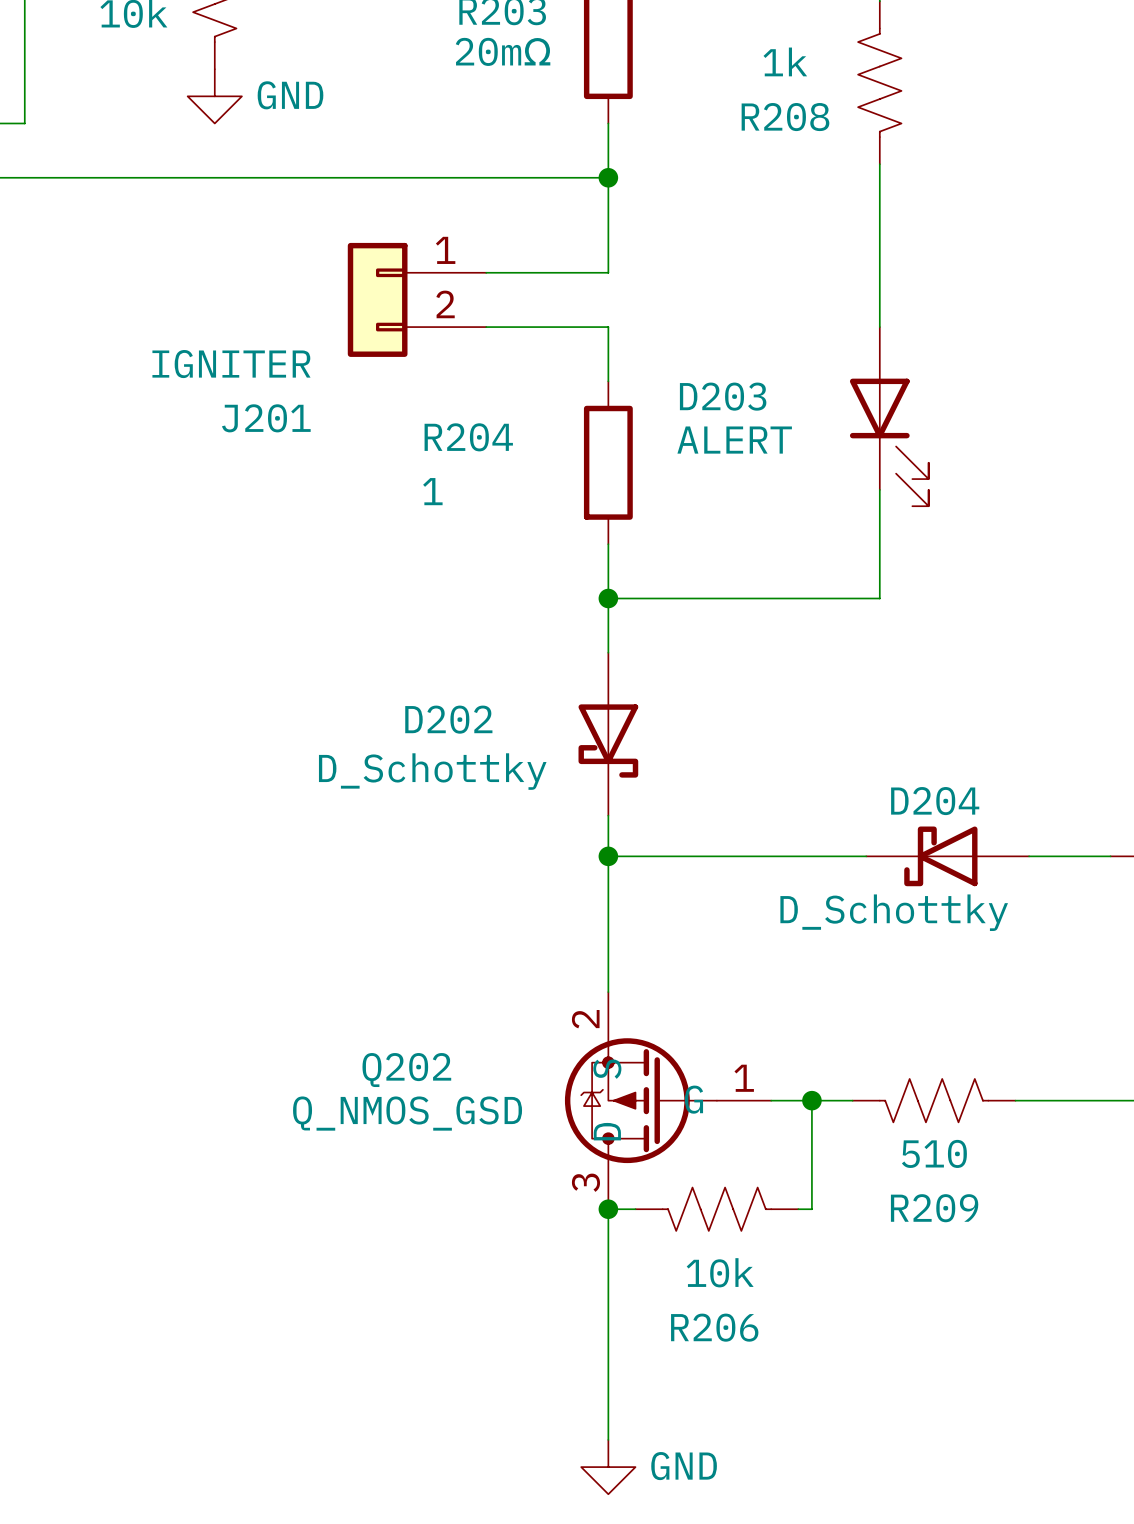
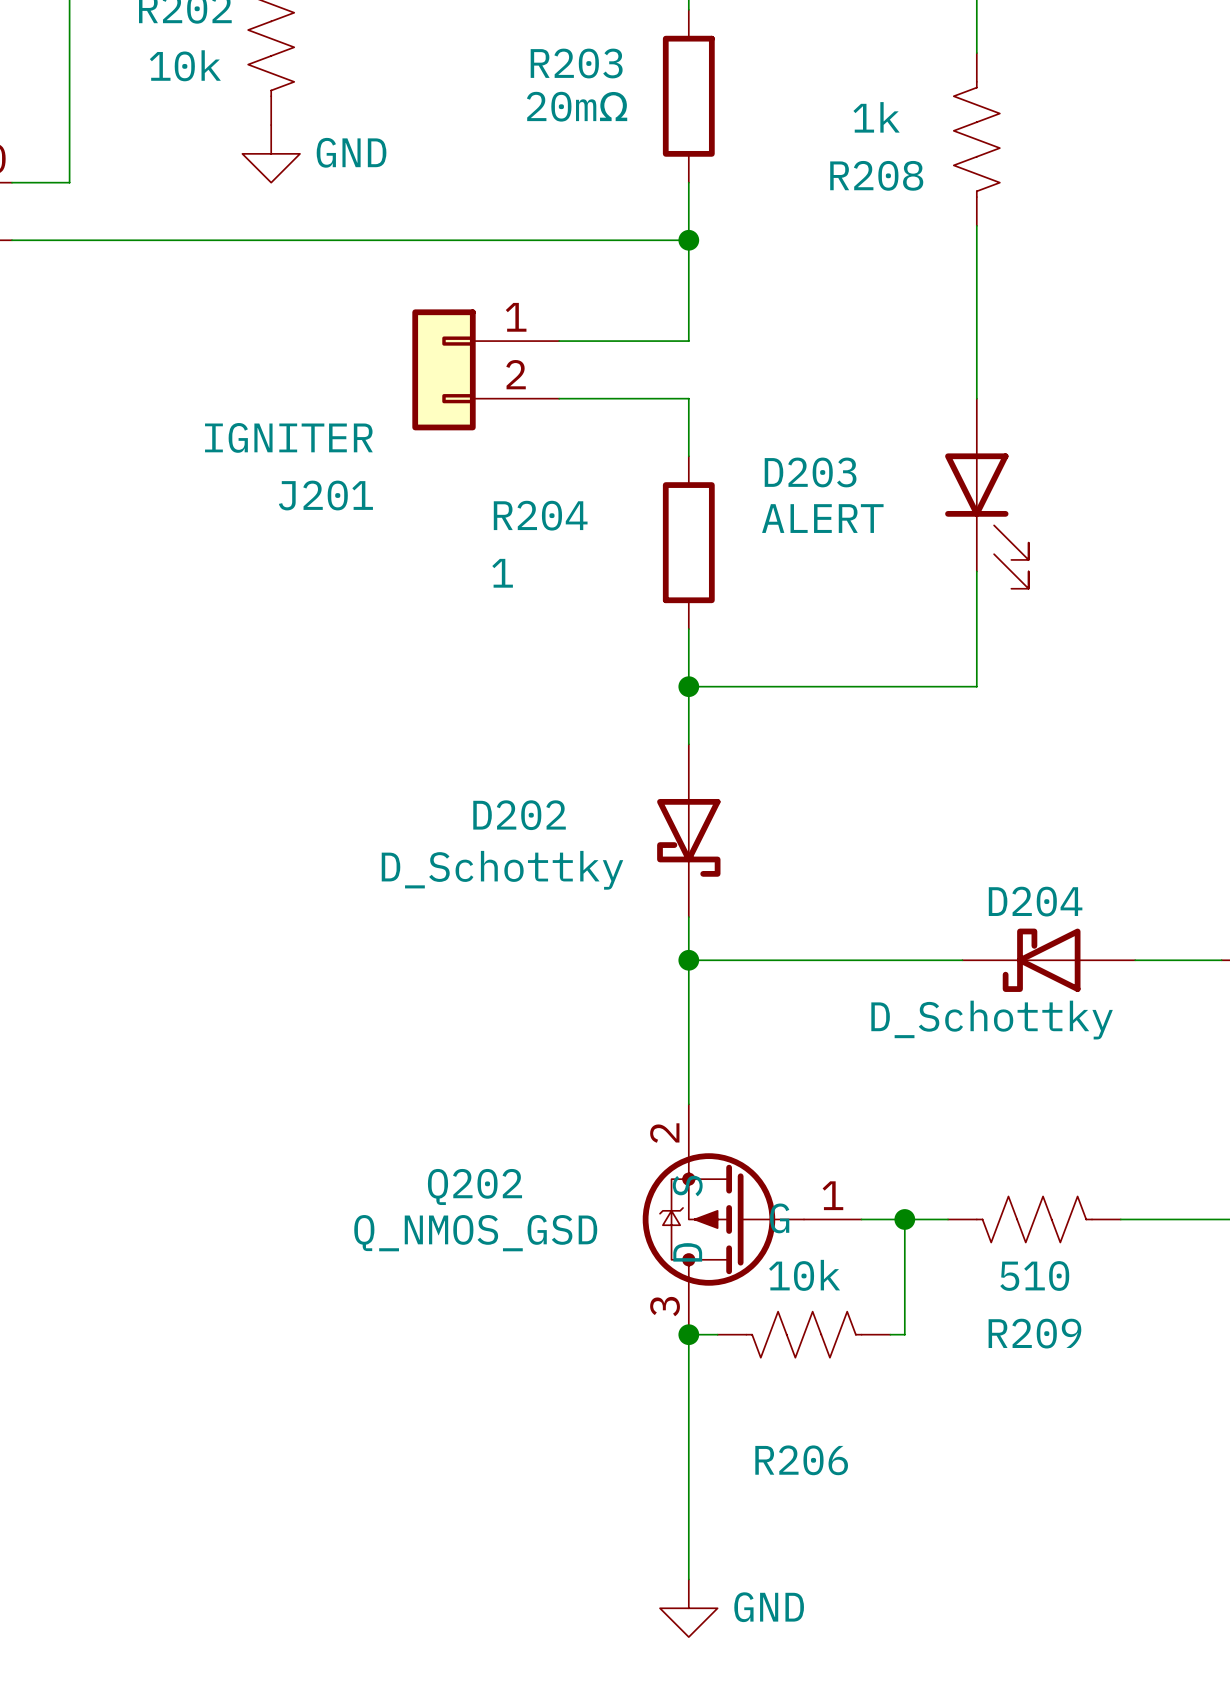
R206 value position: 10k (720, 1272) -> 10k (804, 1275)

